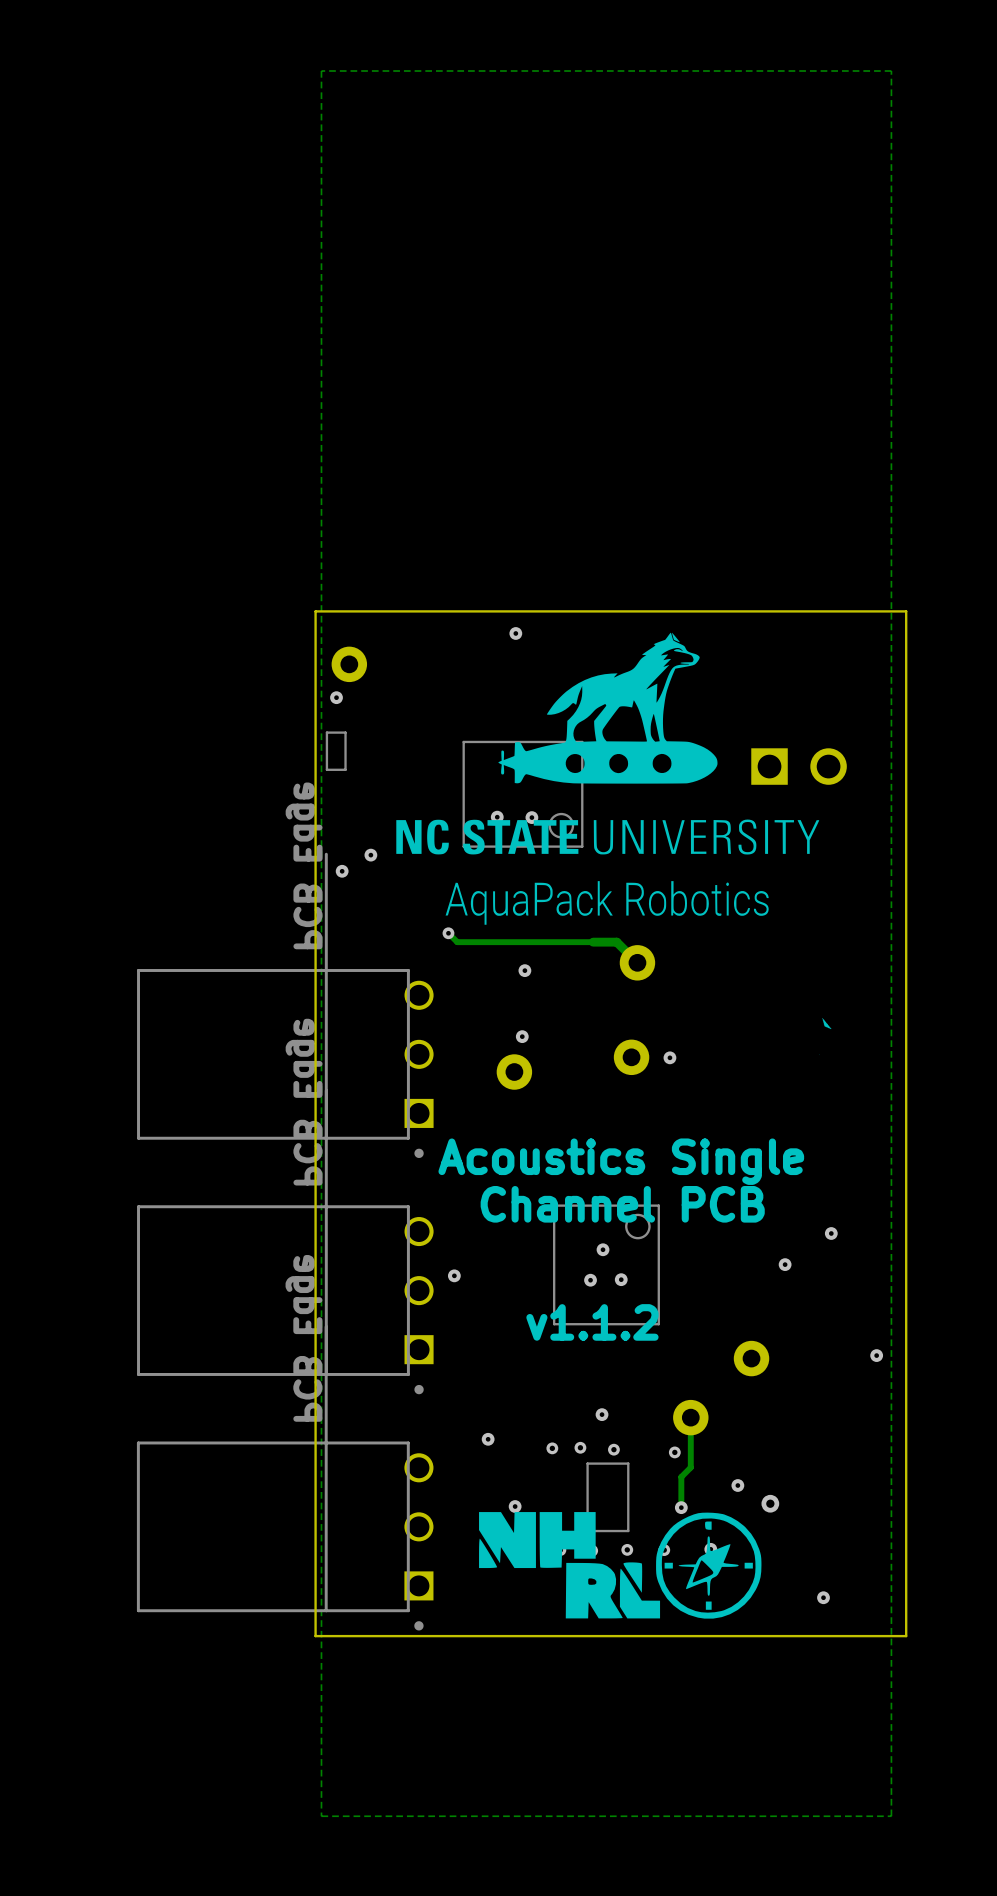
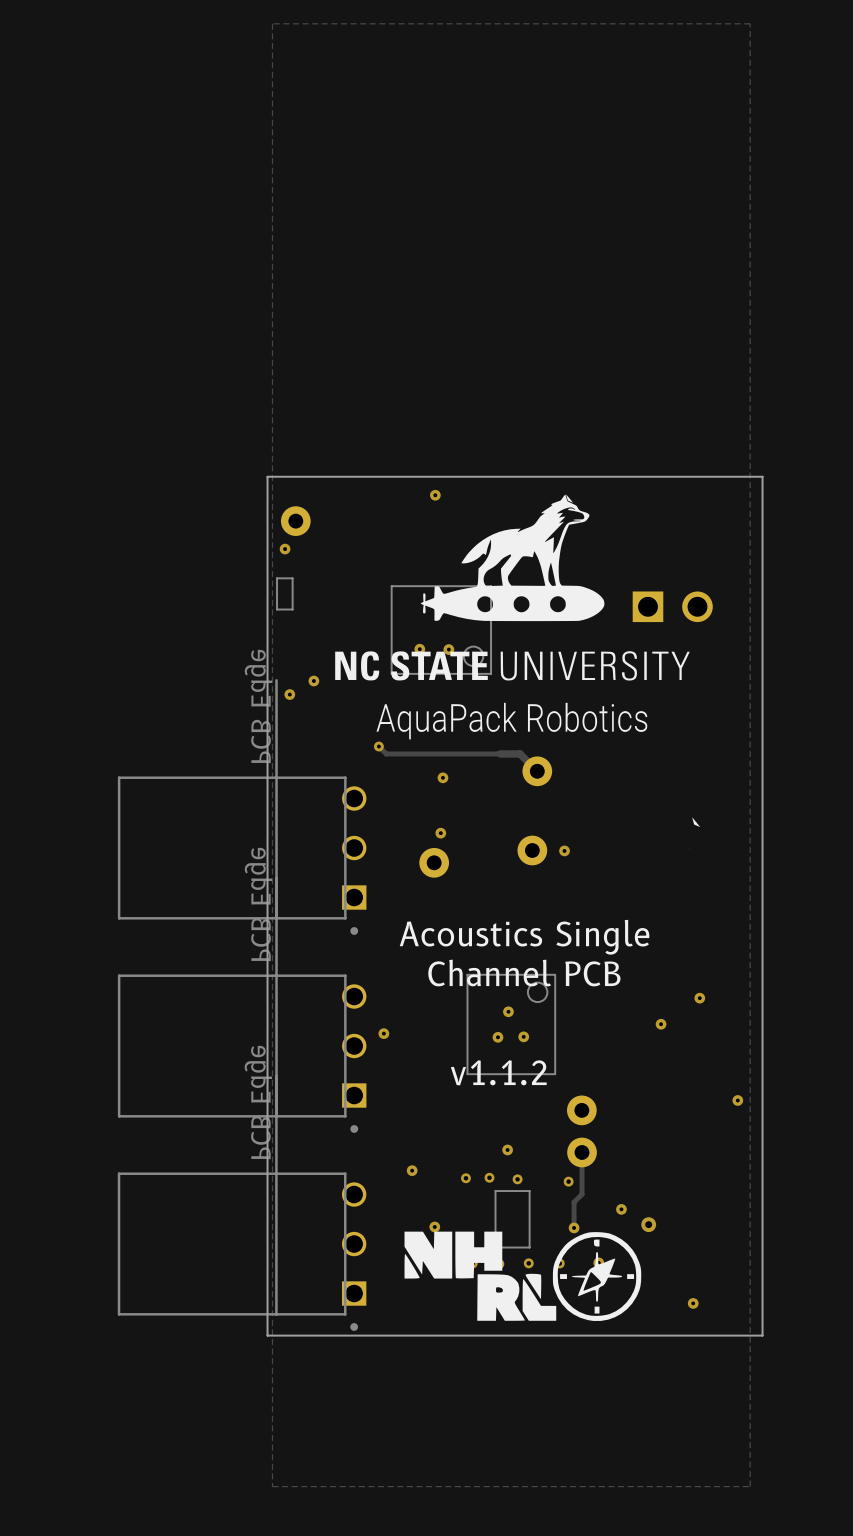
part position: (751, 1358) -> (581, 1110)

